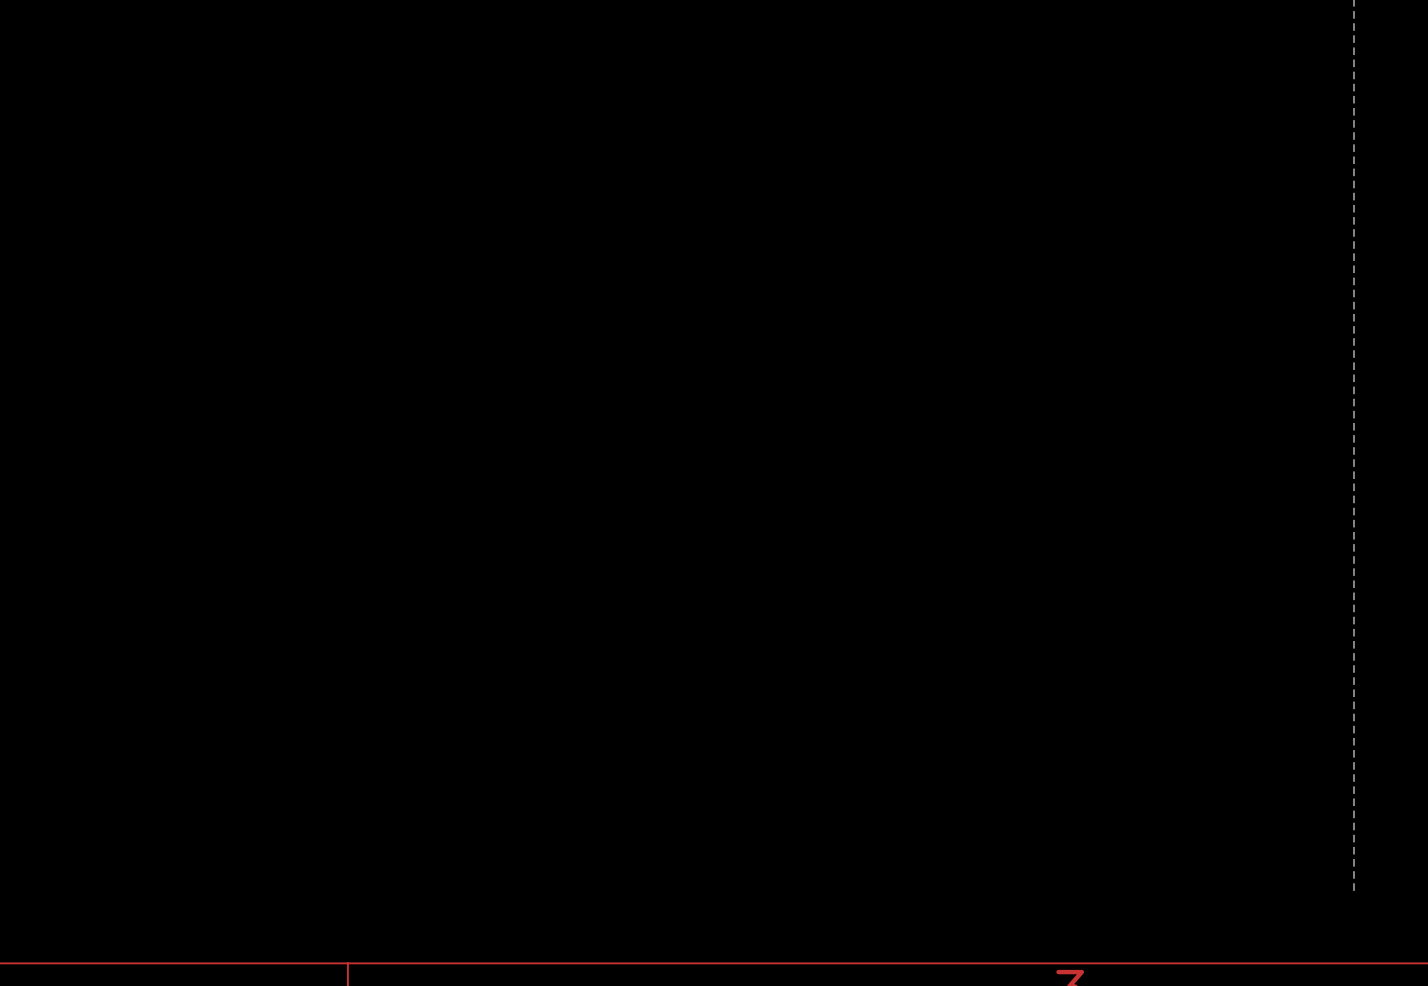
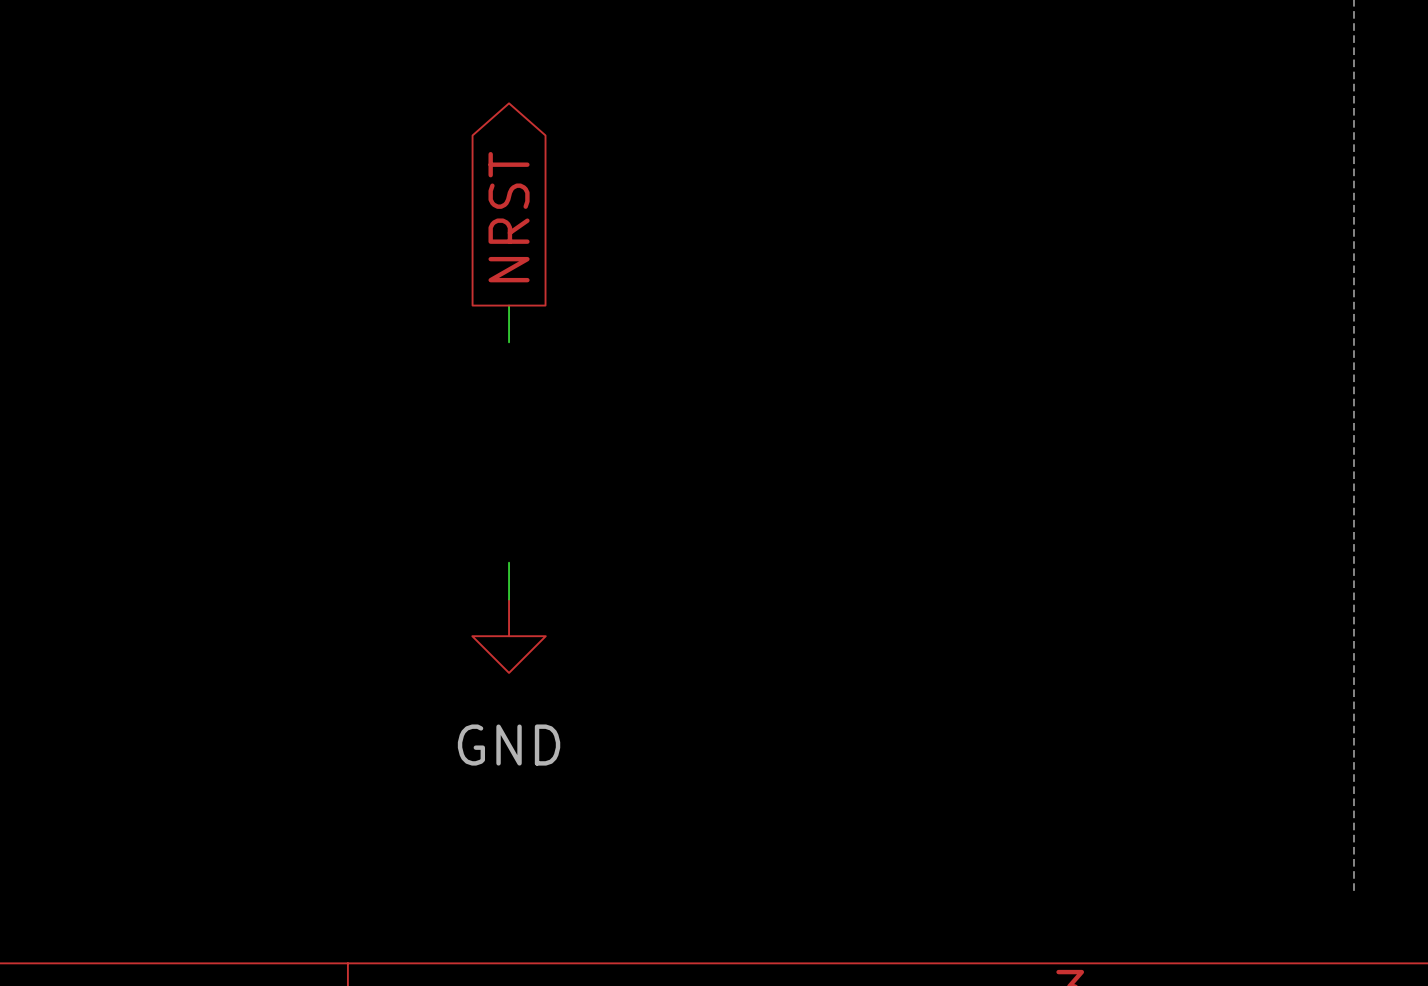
global label: none -> NRST (509, 217)
wire: none -> (509, 305) (509, 342)
wire: none -> (509, 562) (509, 599)
power symbol: none -> GND (509, 636)

